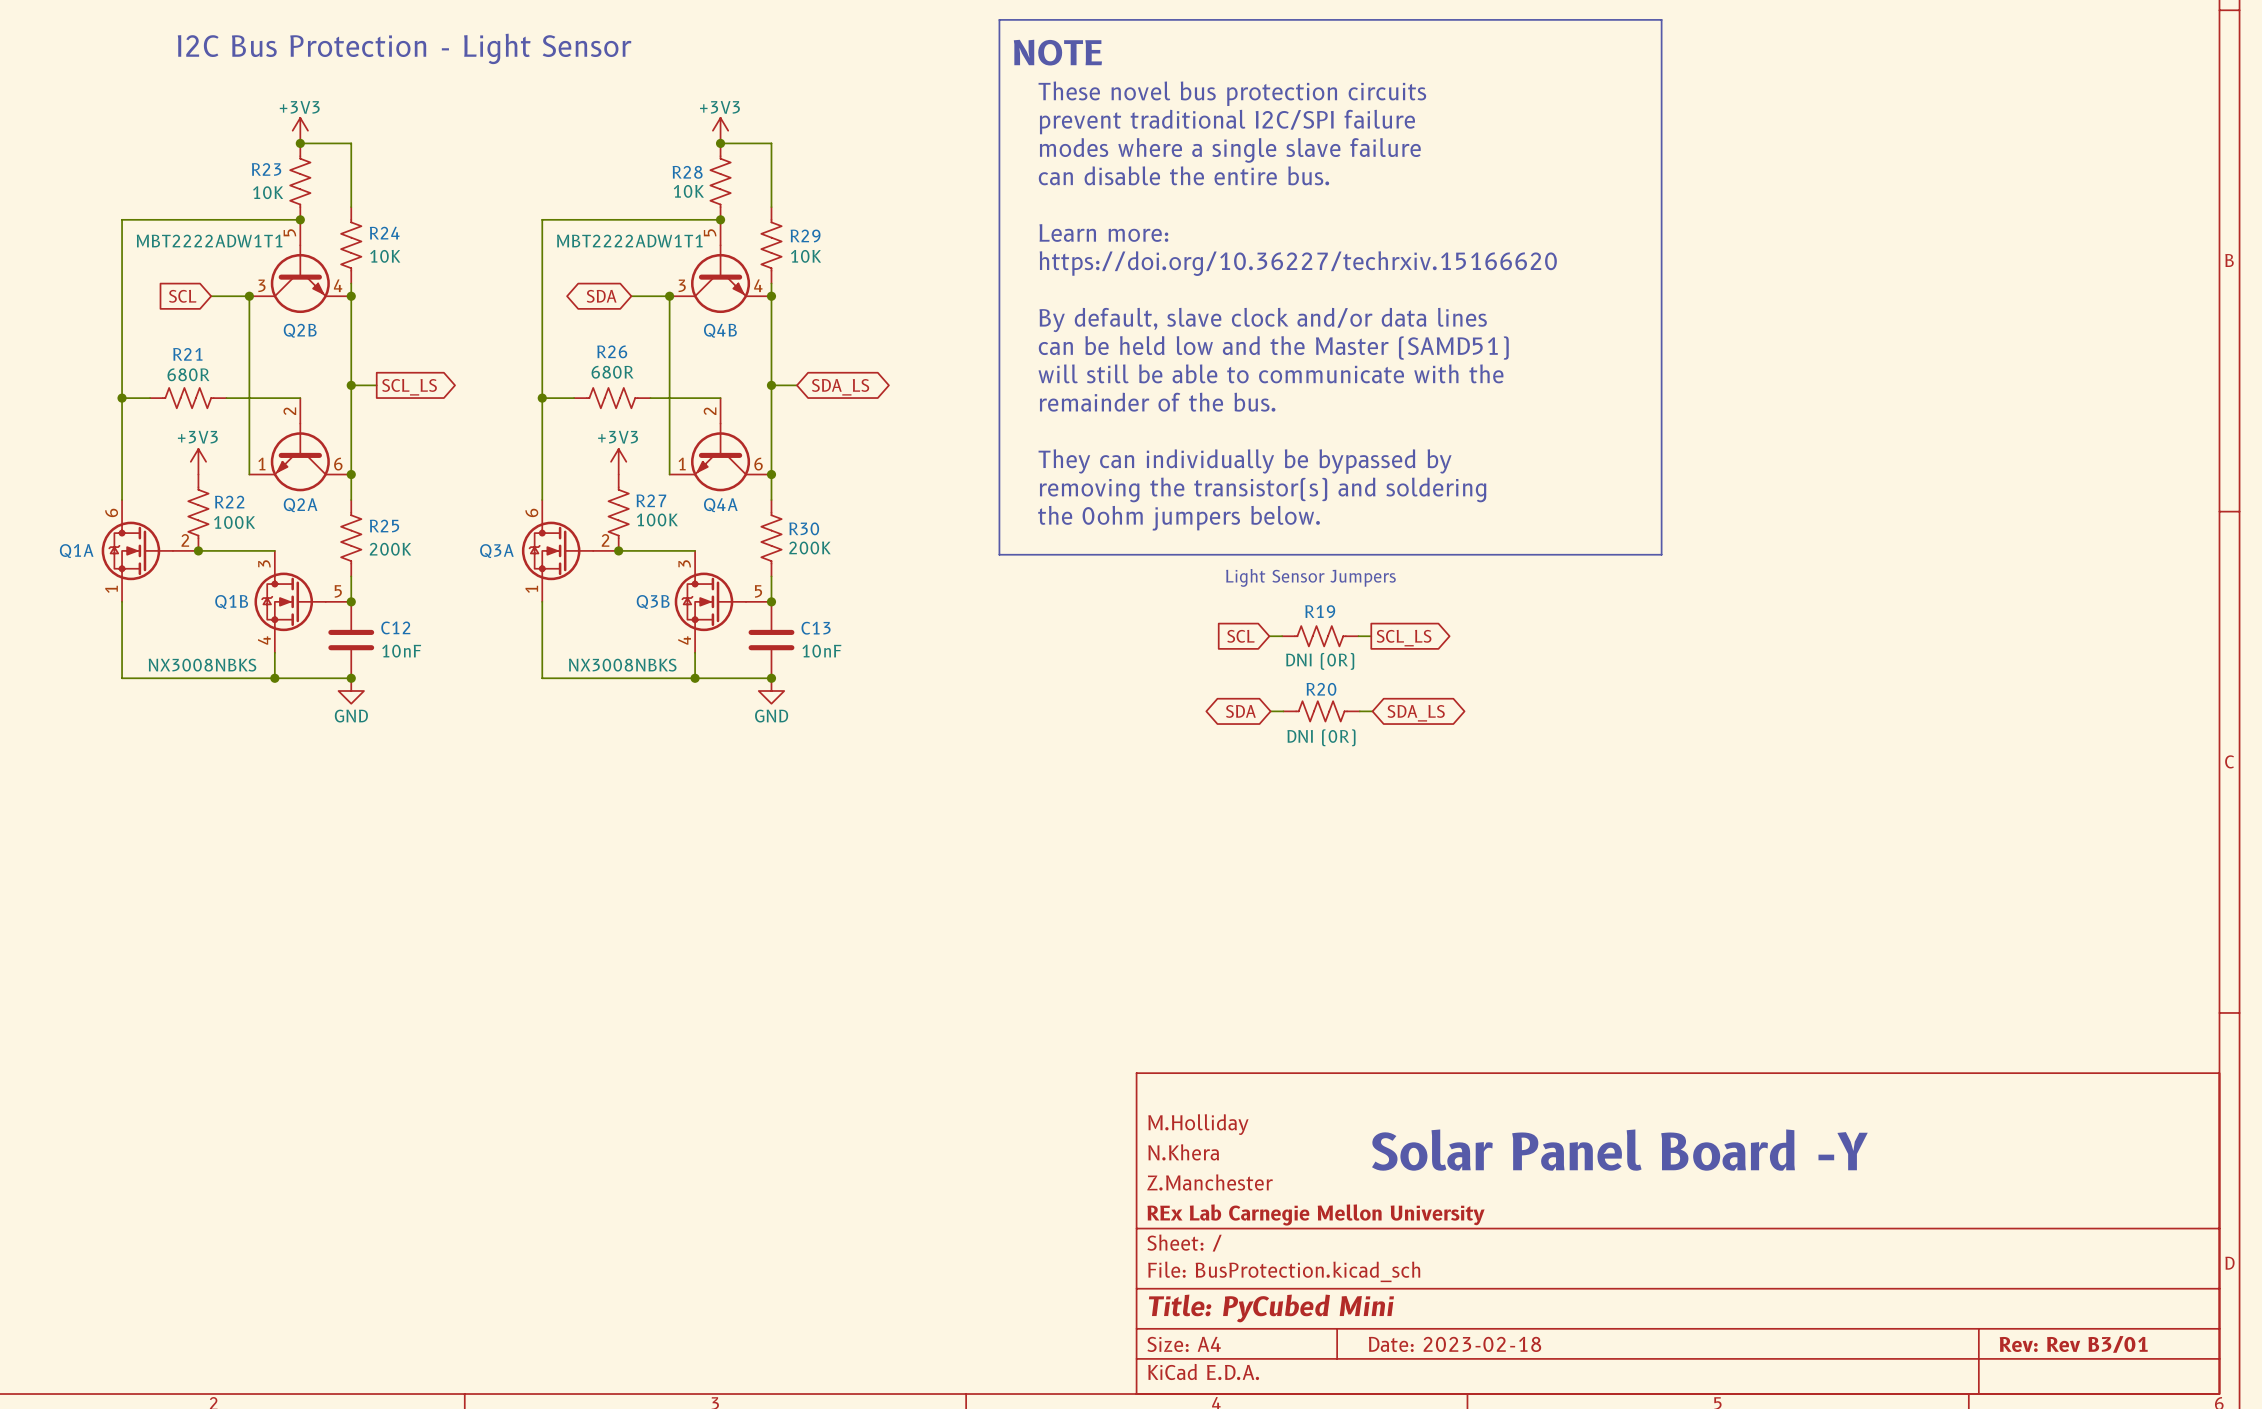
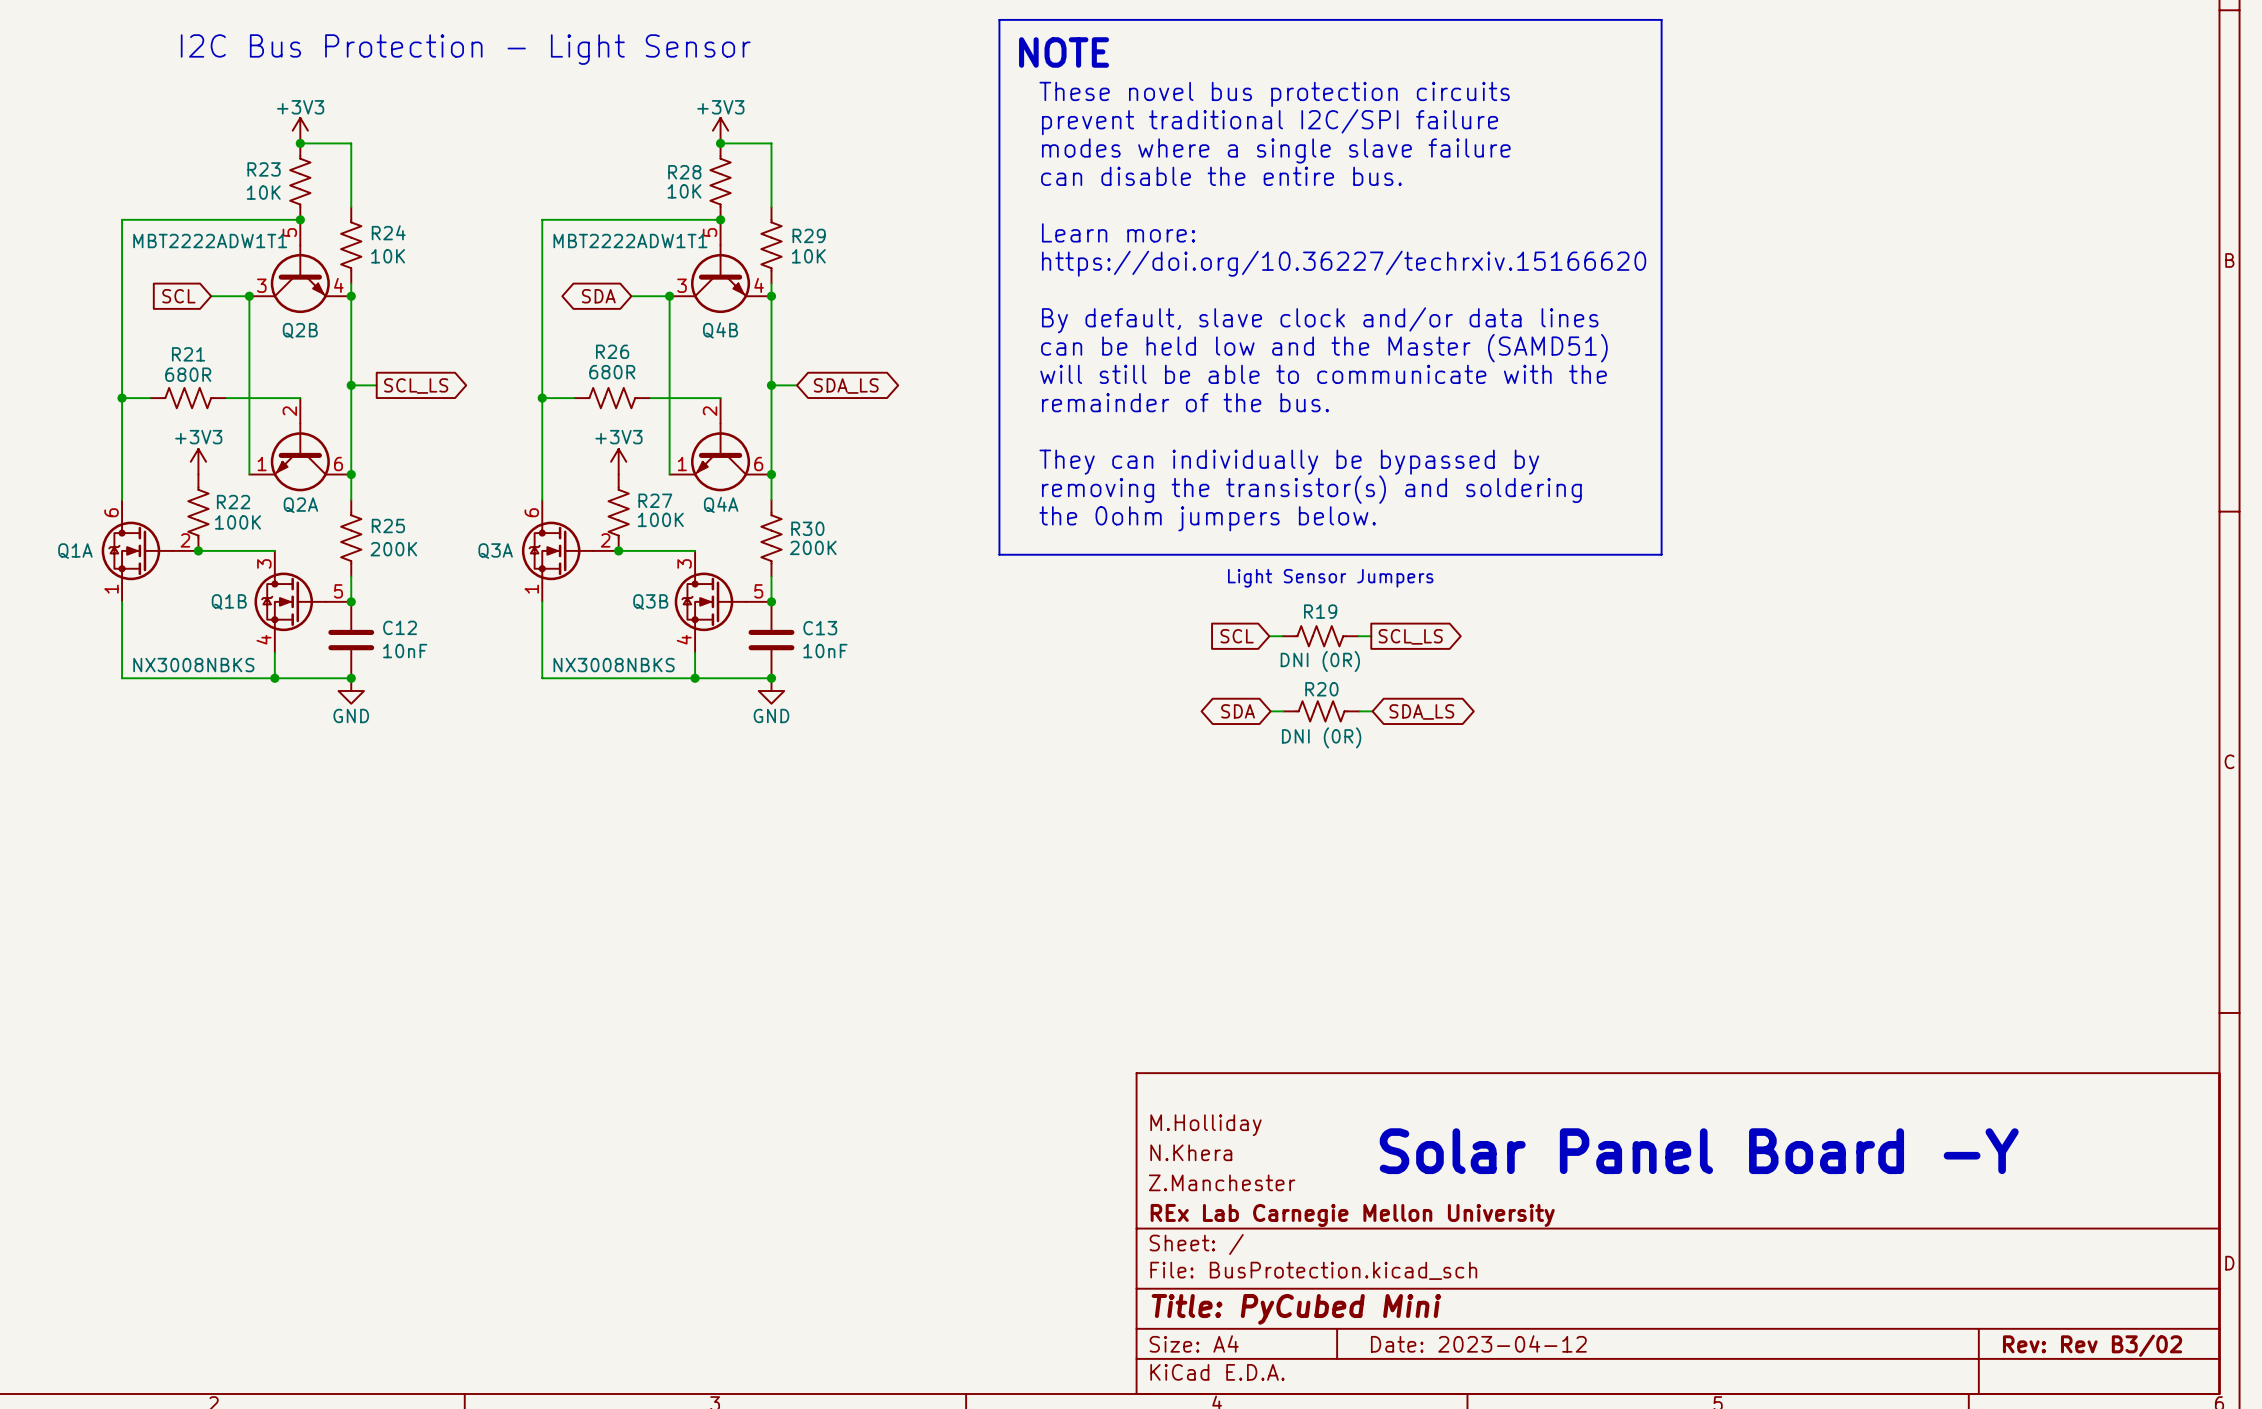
title block: Date: 2023-02-18 (1455, 1344) -> Date: 2023-04-12 (1478, 1343)
title block: Rev: Rev B3/01 (2073, 1344) -> Rev: Rev B3/02 (2092, 1345)

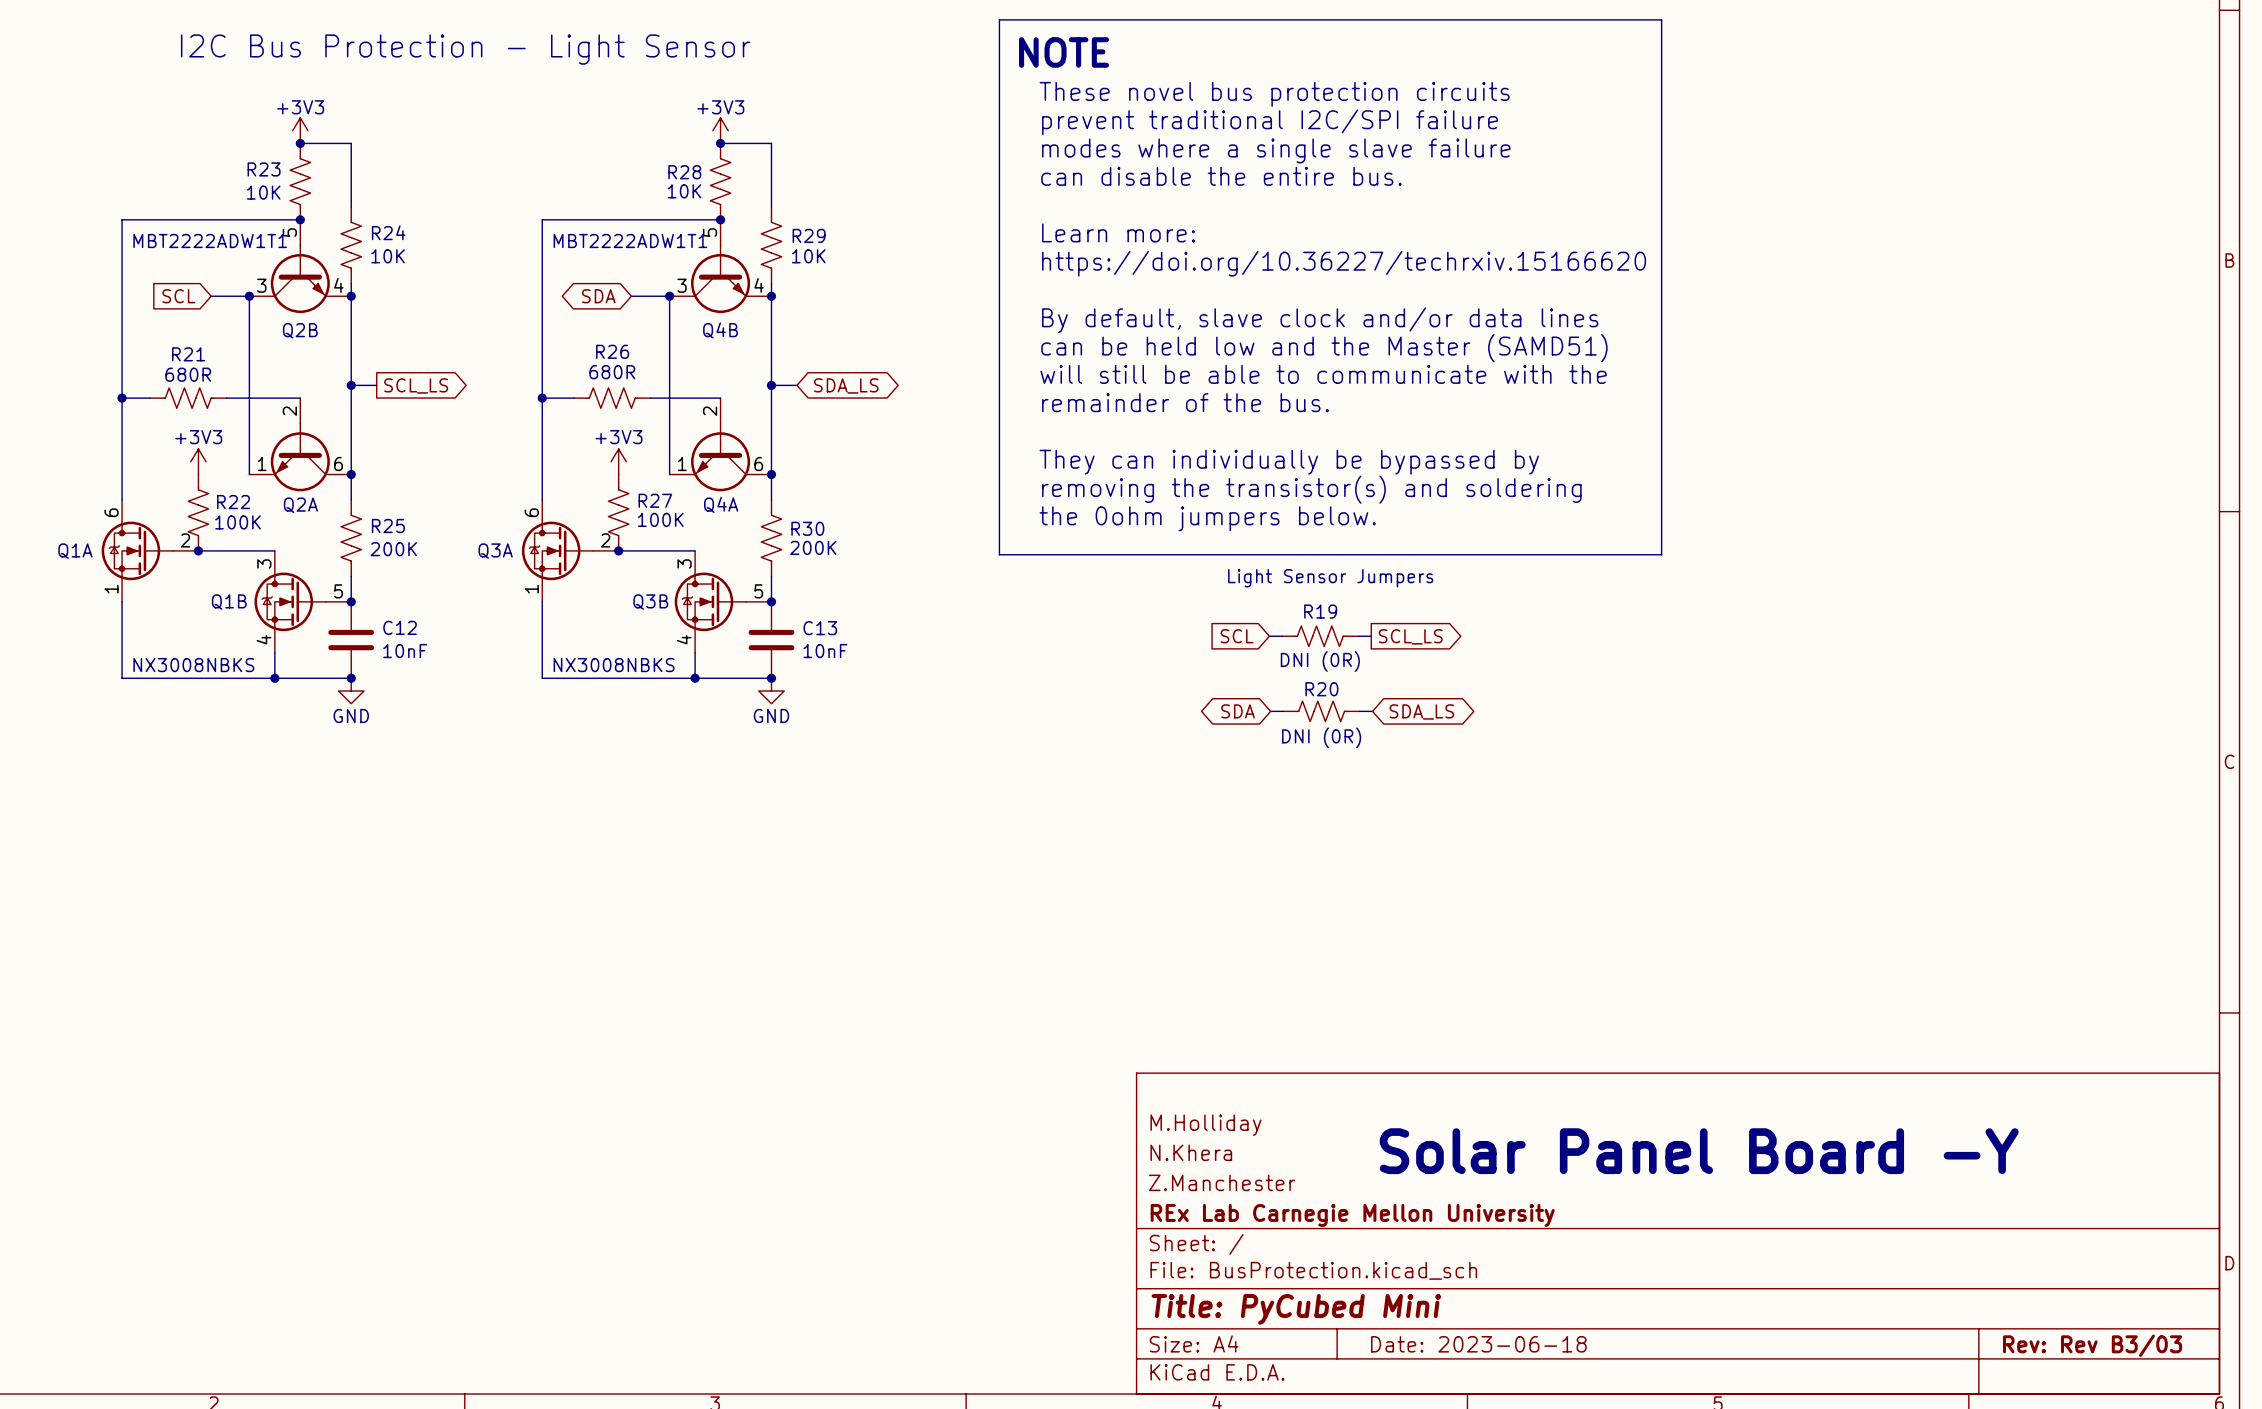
title block: Date: 2023-04-12 (1478, 1343) -> Date: 2023-06-18 (1478, 1344)
title block: Rev: Rev B3/02 (2092, 1345) -> Rev: Rev B3/03 (2092, 1345)

